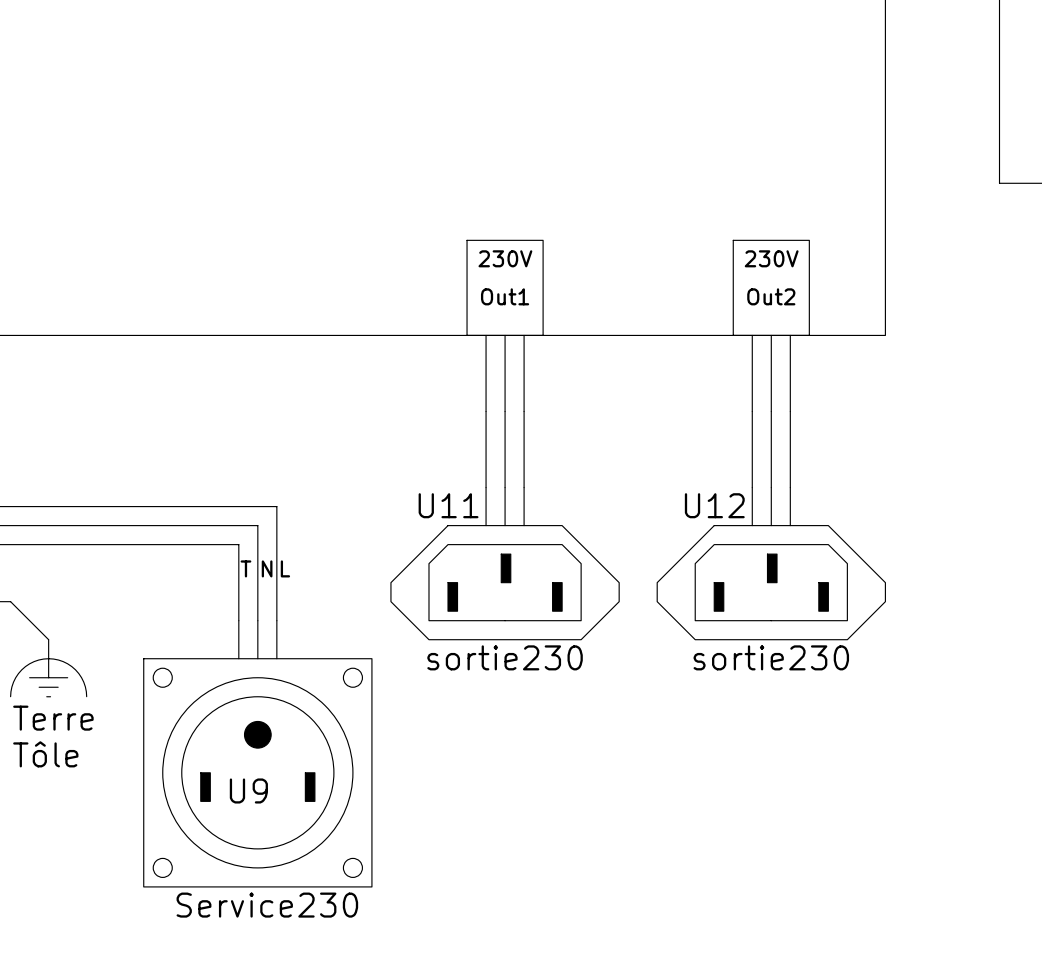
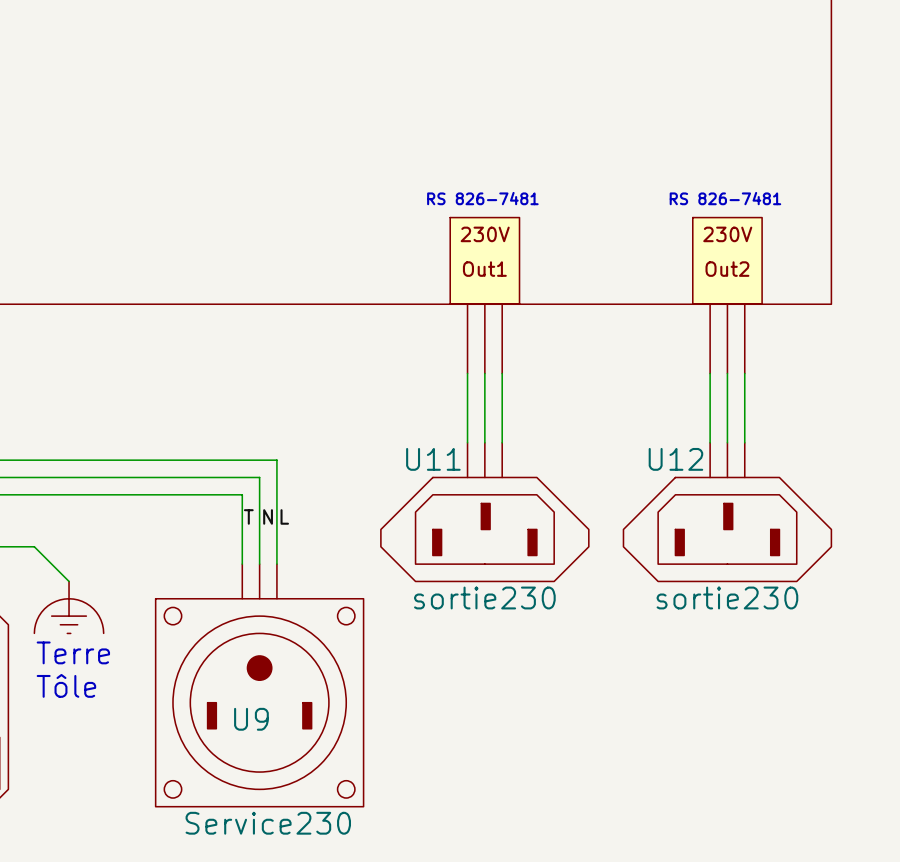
text: none -> RS 826-7481 (482, 198)
text: none -> RS 826-7481 (725, 198)

